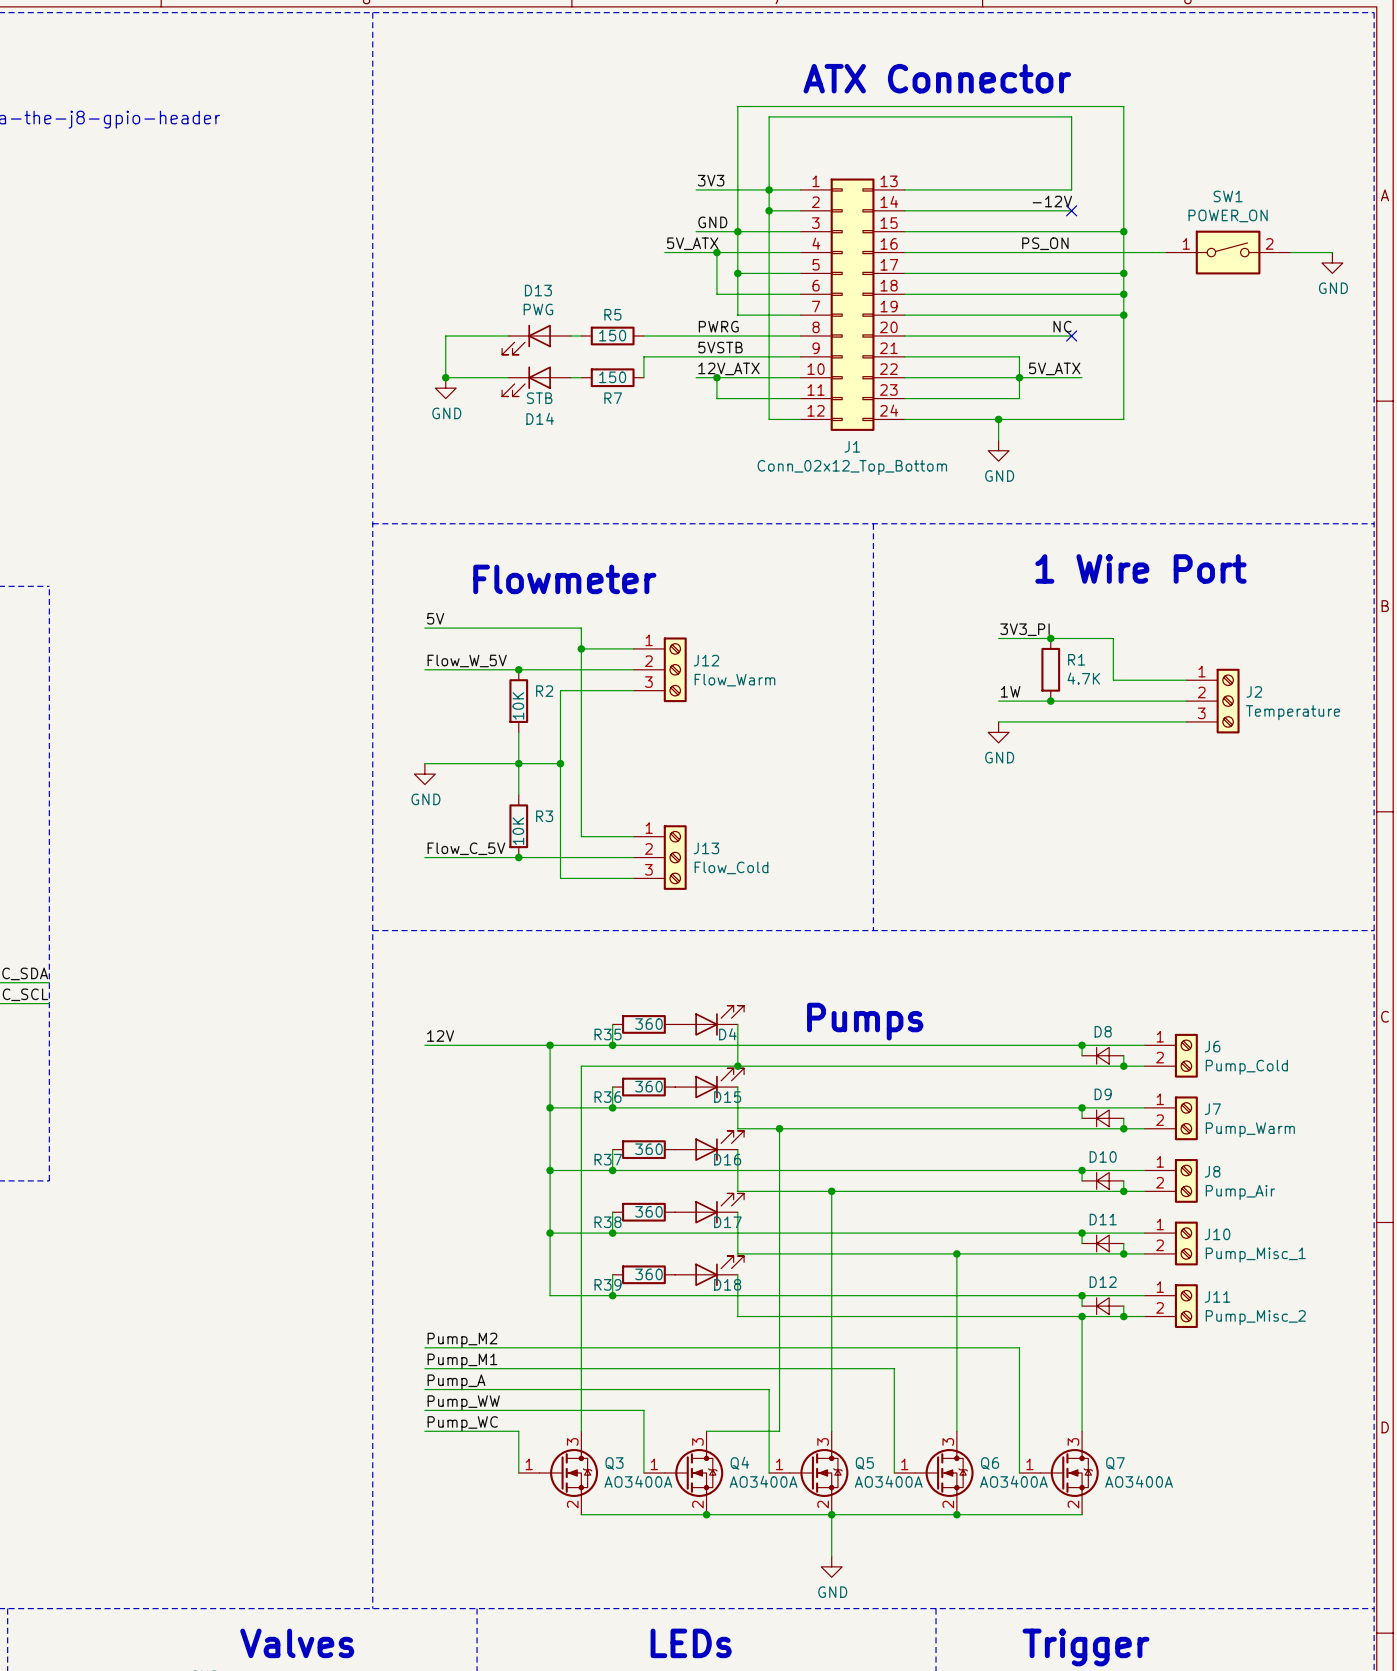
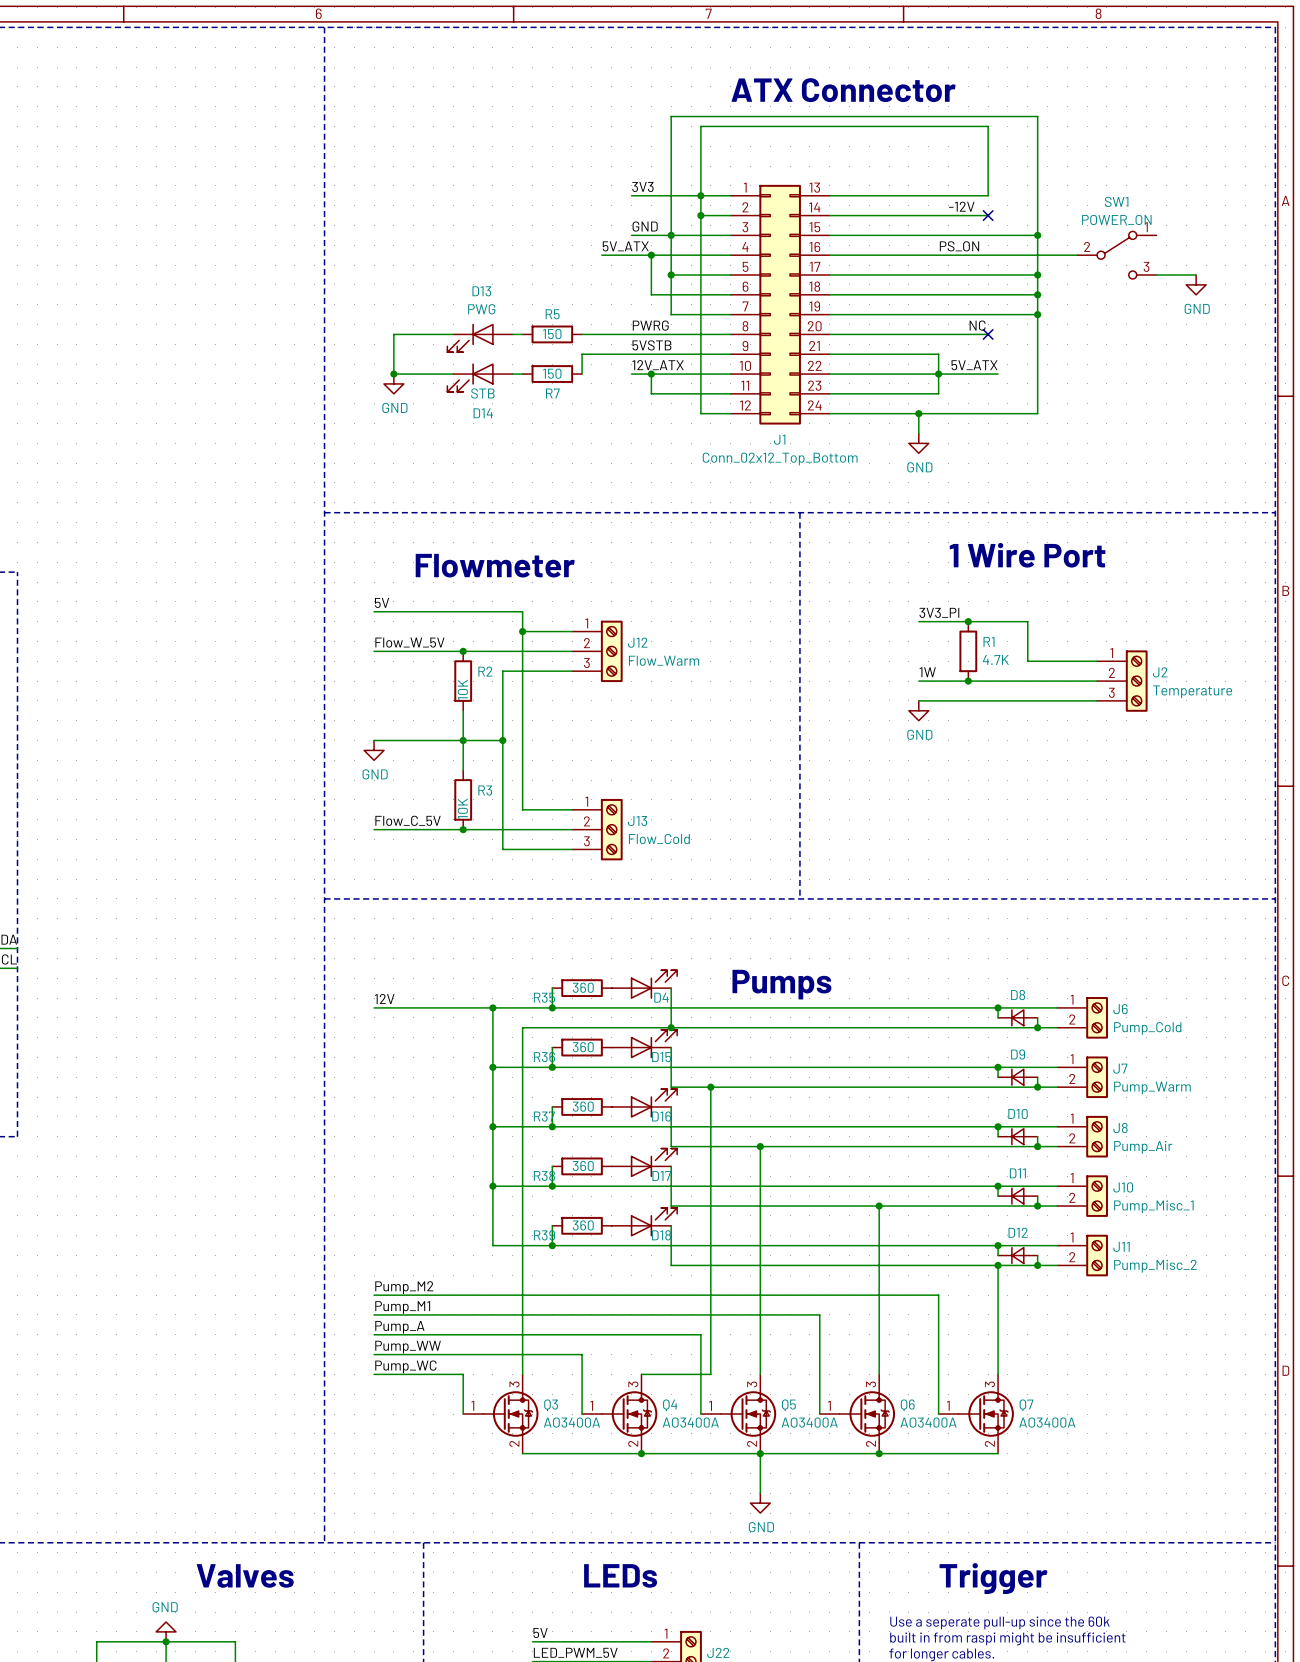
SW1 symbol: [1165, 230, 1291, 275] -> [1077, 231, 1157, 279]
wire: (1290, 252) (1332, 252) -> (1156, 275) (1196, 275)
power symbol position: GND (1332, 262) -> GND (1196, 284)

